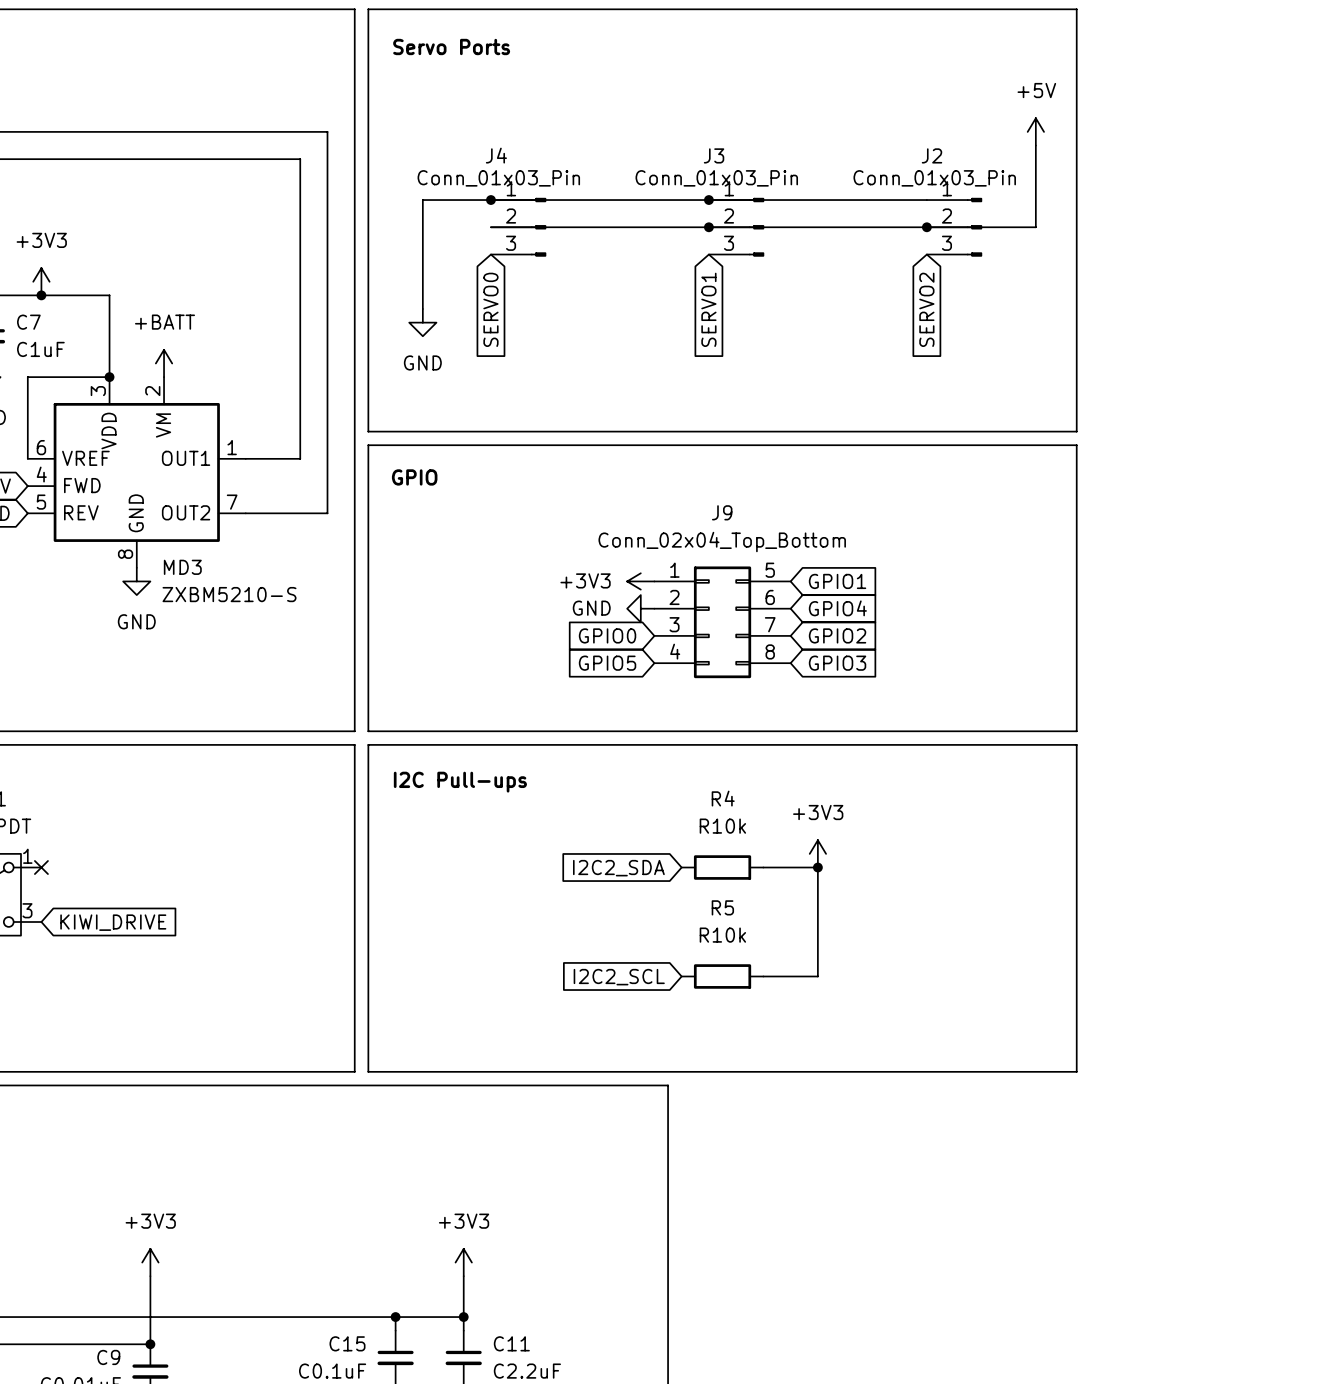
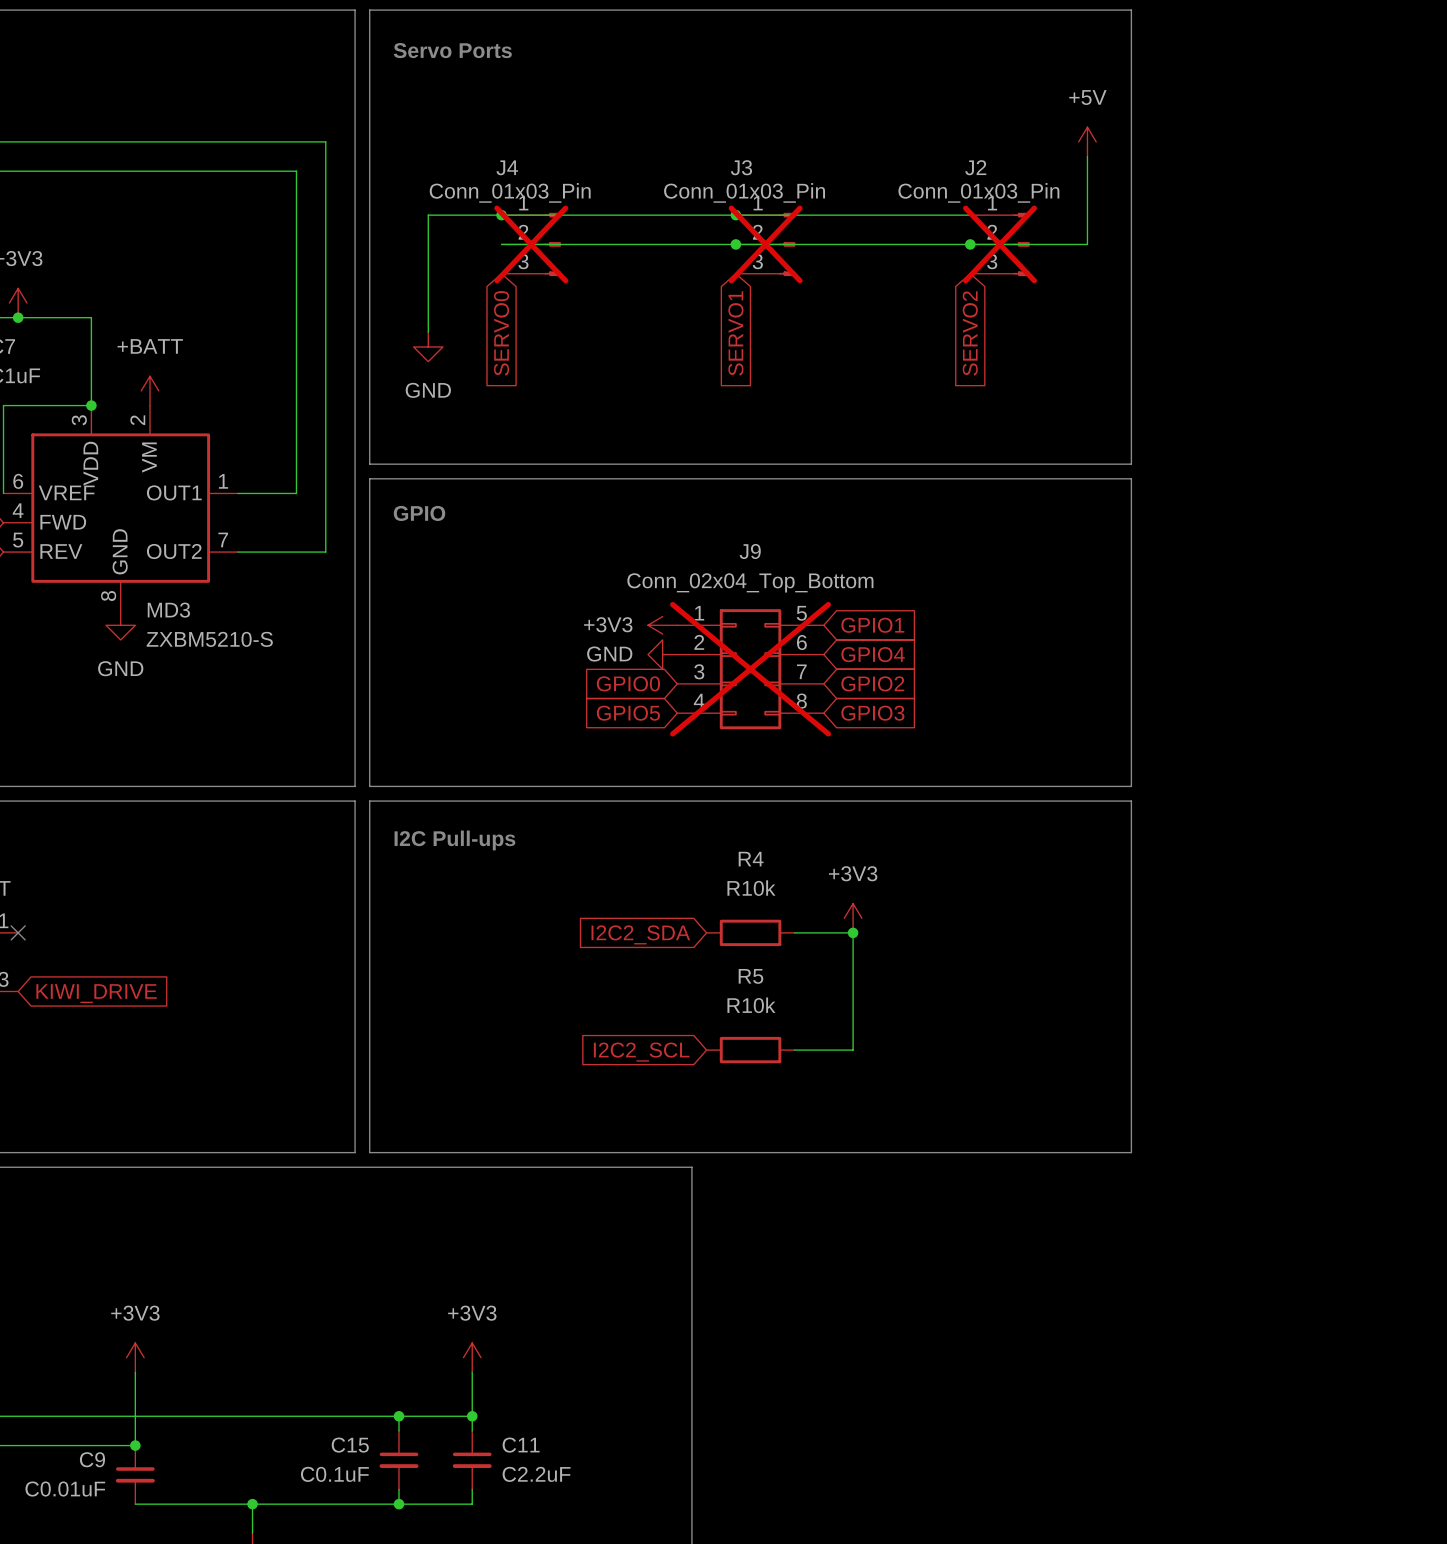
J4 do-not-place cross: none -> (531, 244)
J3 do-not-place cross: none -> (765, 244)
J2 do-not-place cross: none -> (1000, 244)
J9 do-not-place cross: none -> (750, 669)

